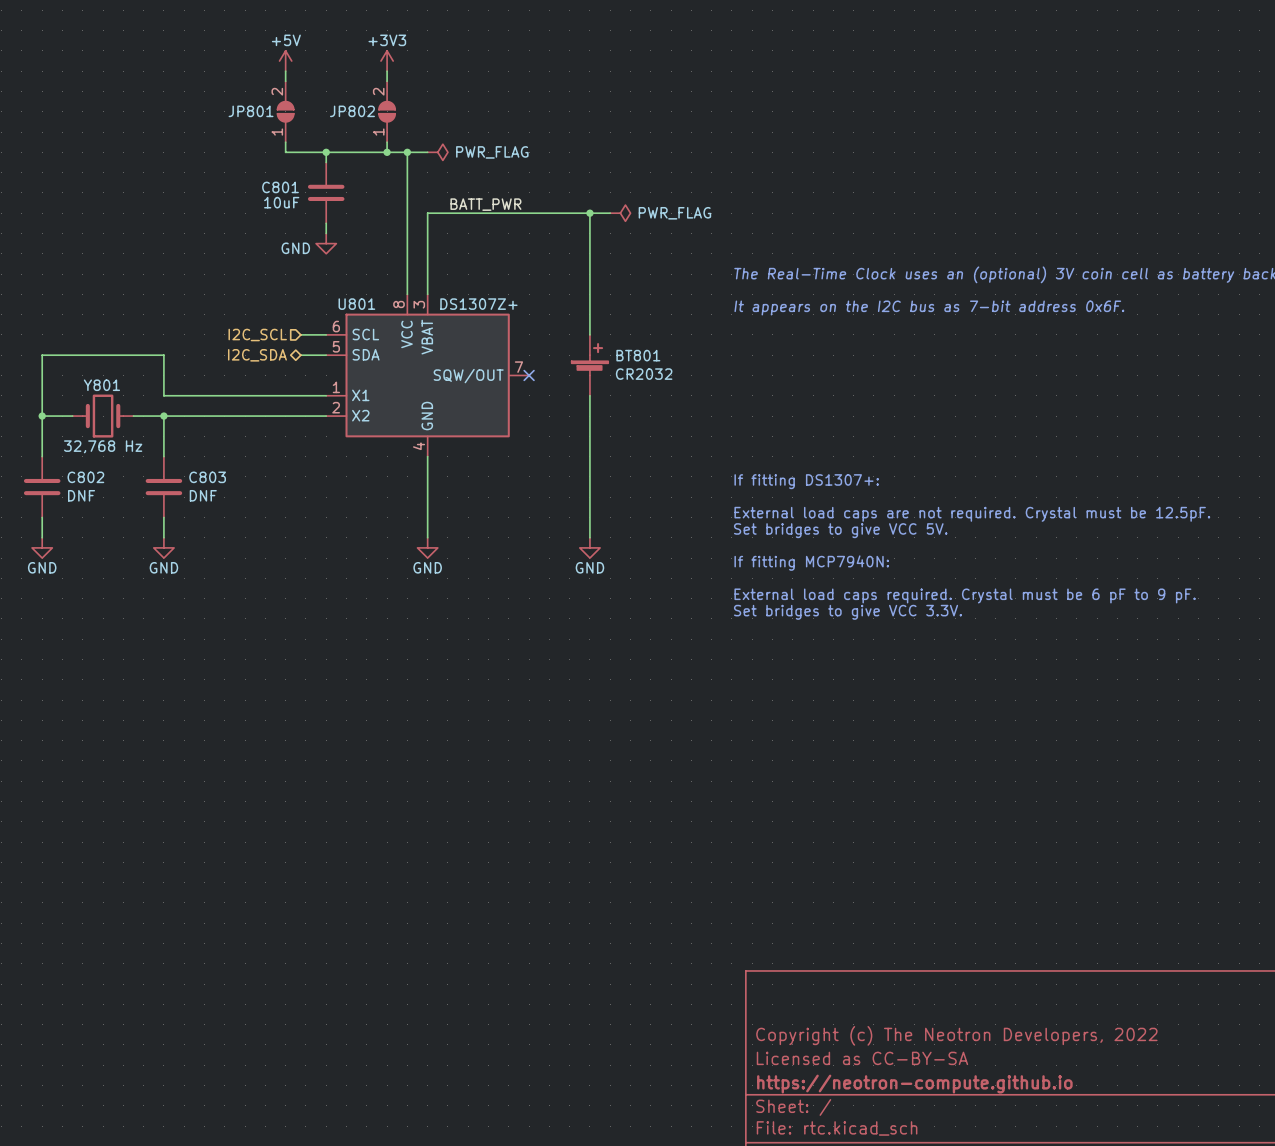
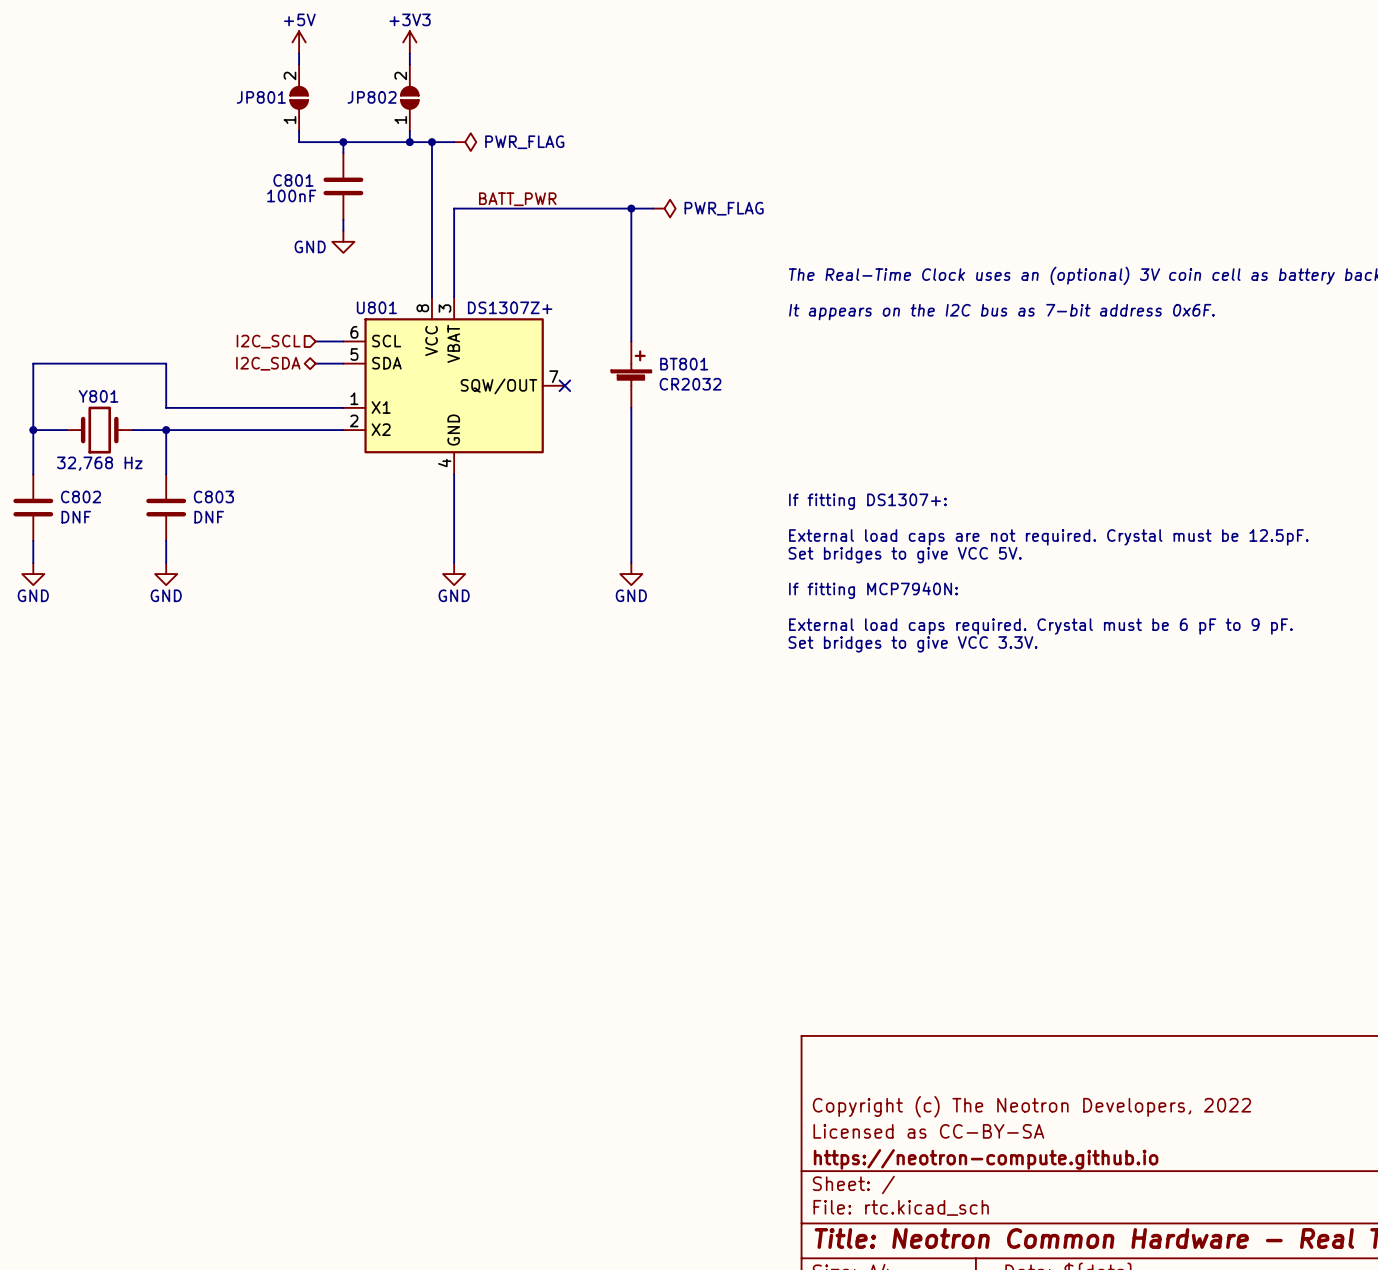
C801 value: 10uF (281, 202) -> 100nF (291, 195)

